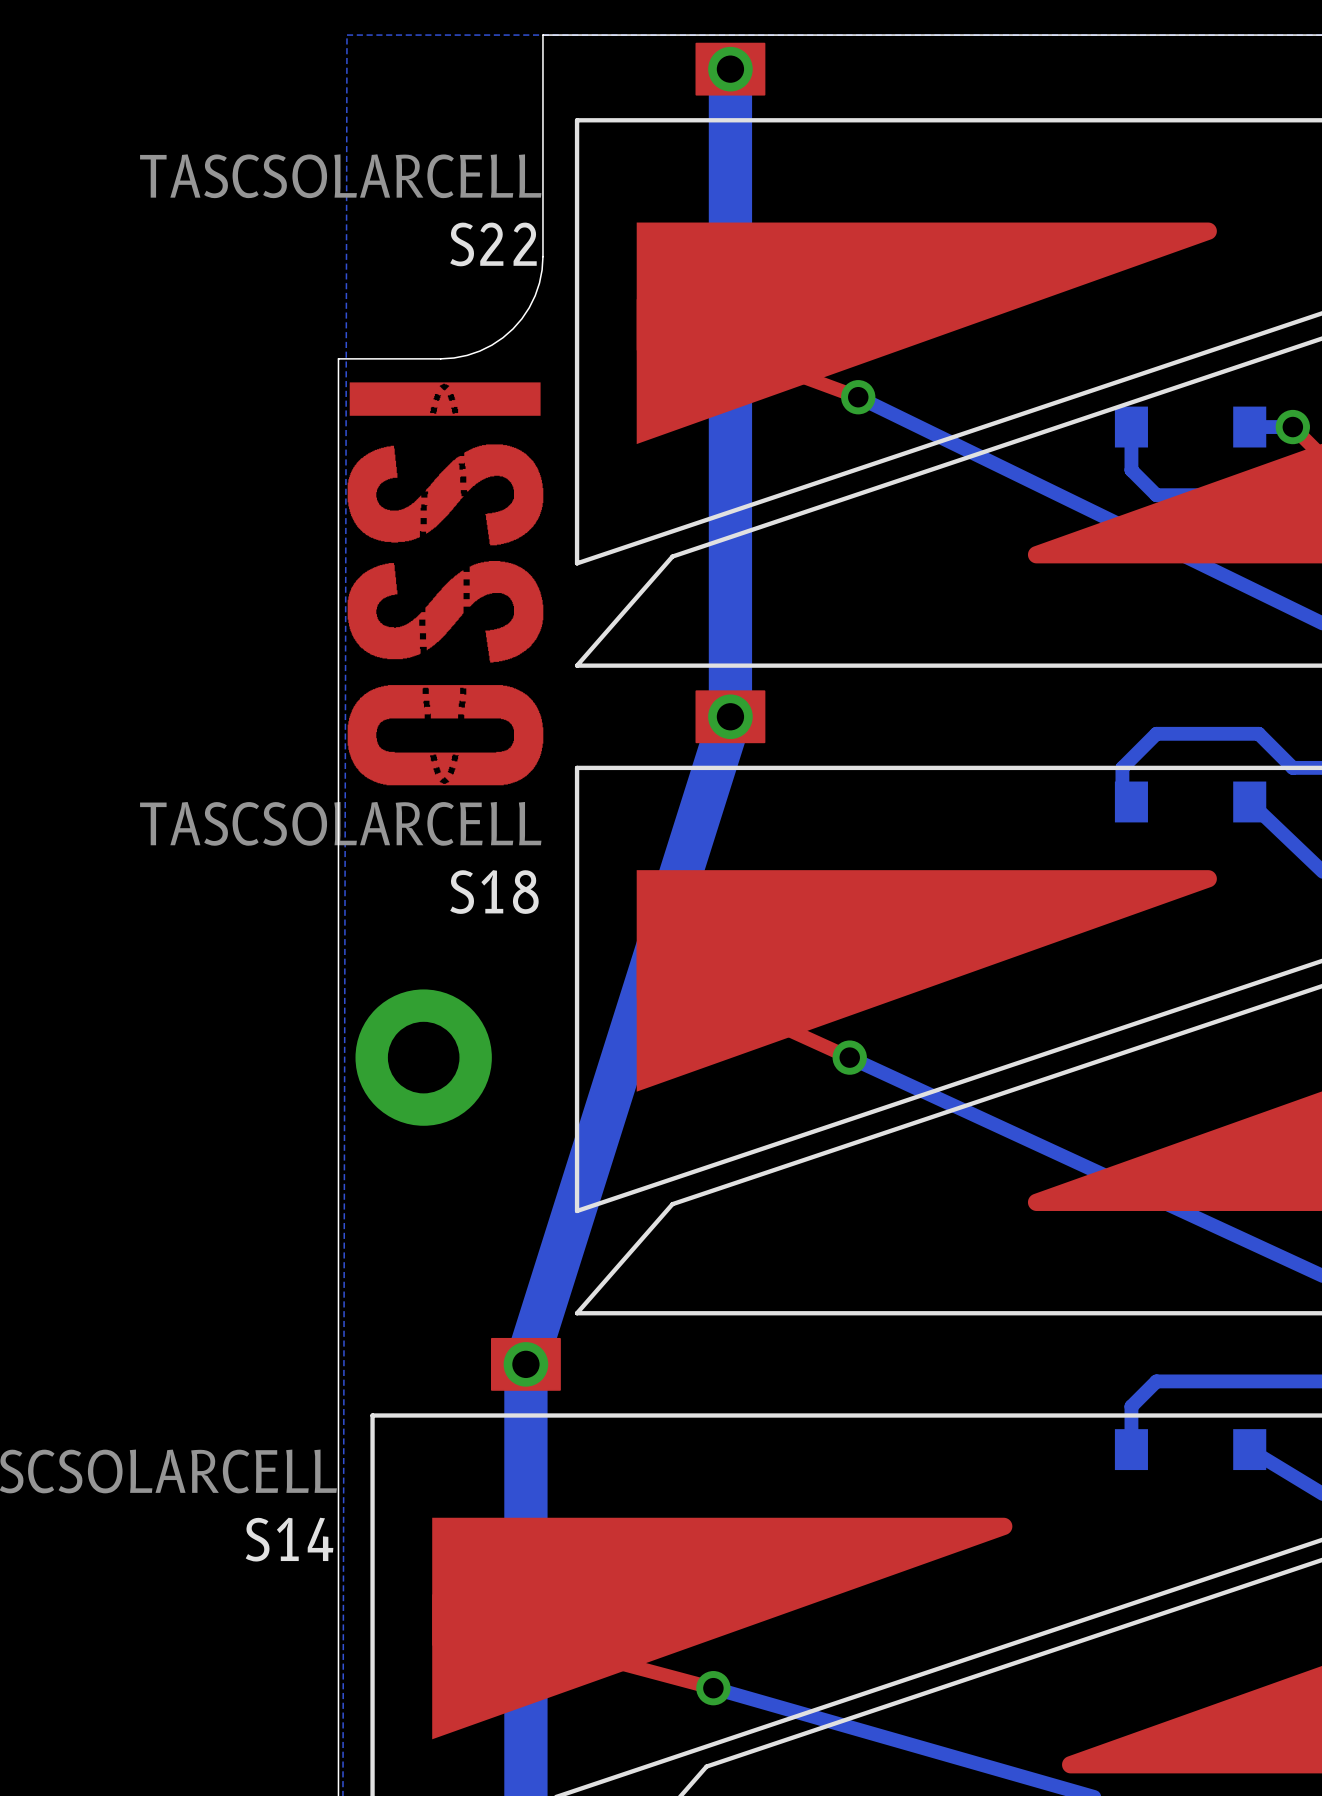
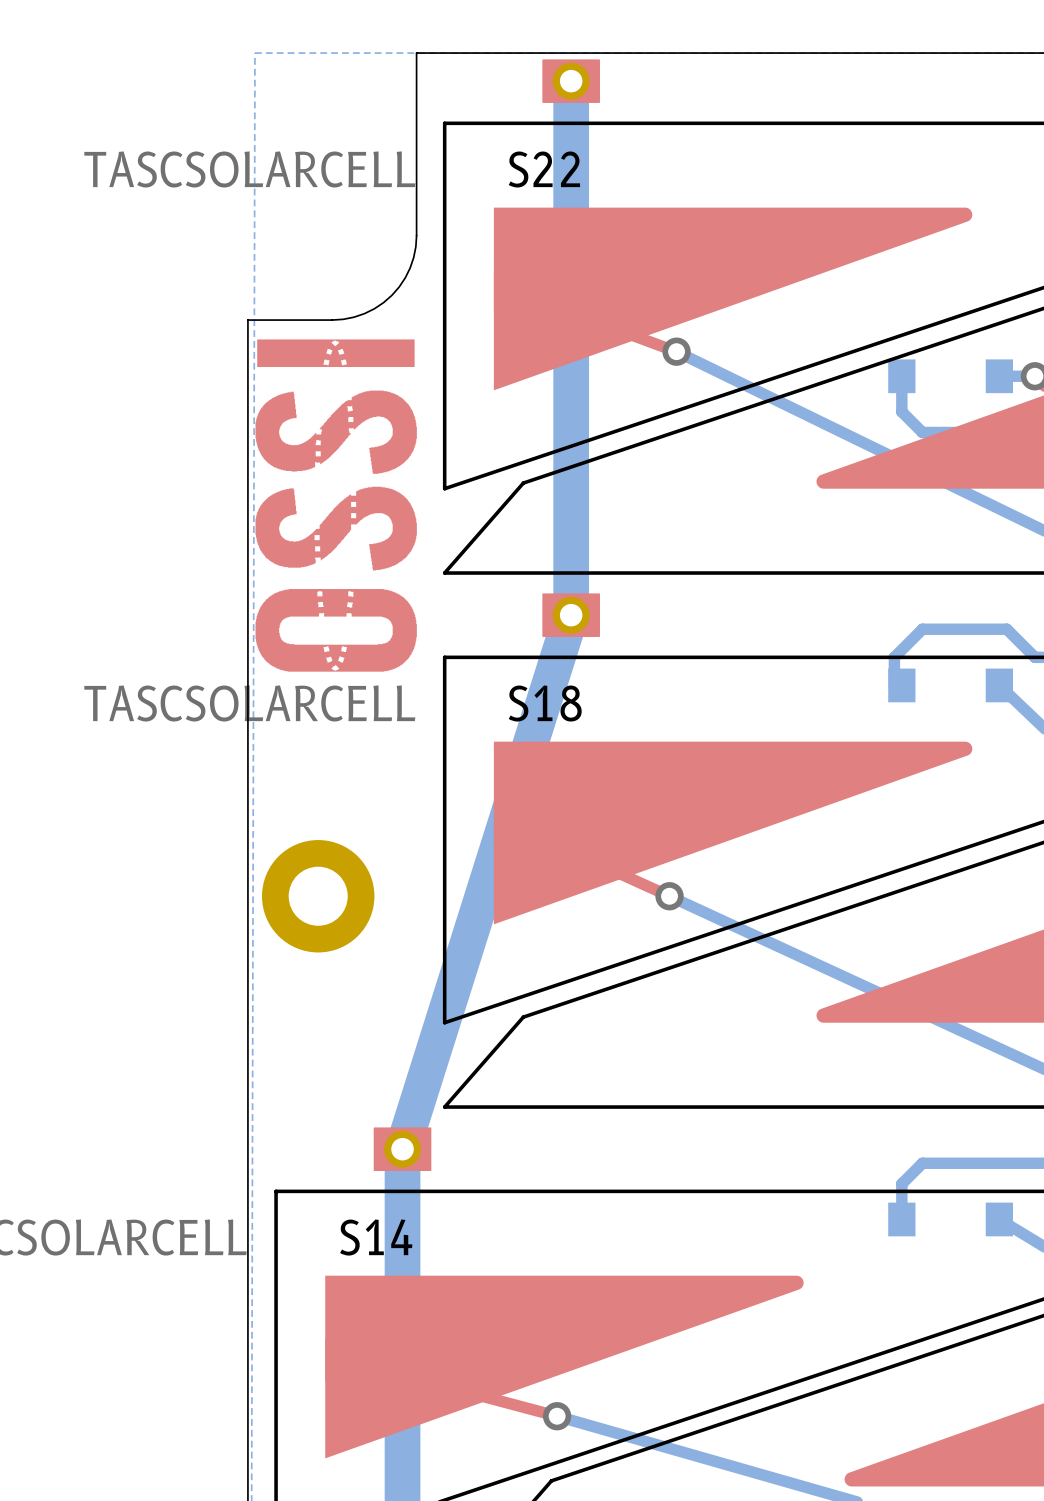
S22 name position: S22 (493, 244) -> S22 (544, 169)
S18 name position: S18 (494, 892) -> S18 (545, 703)
S14 name position: S14 (289, 1539) -> S14 (376, 1237)

